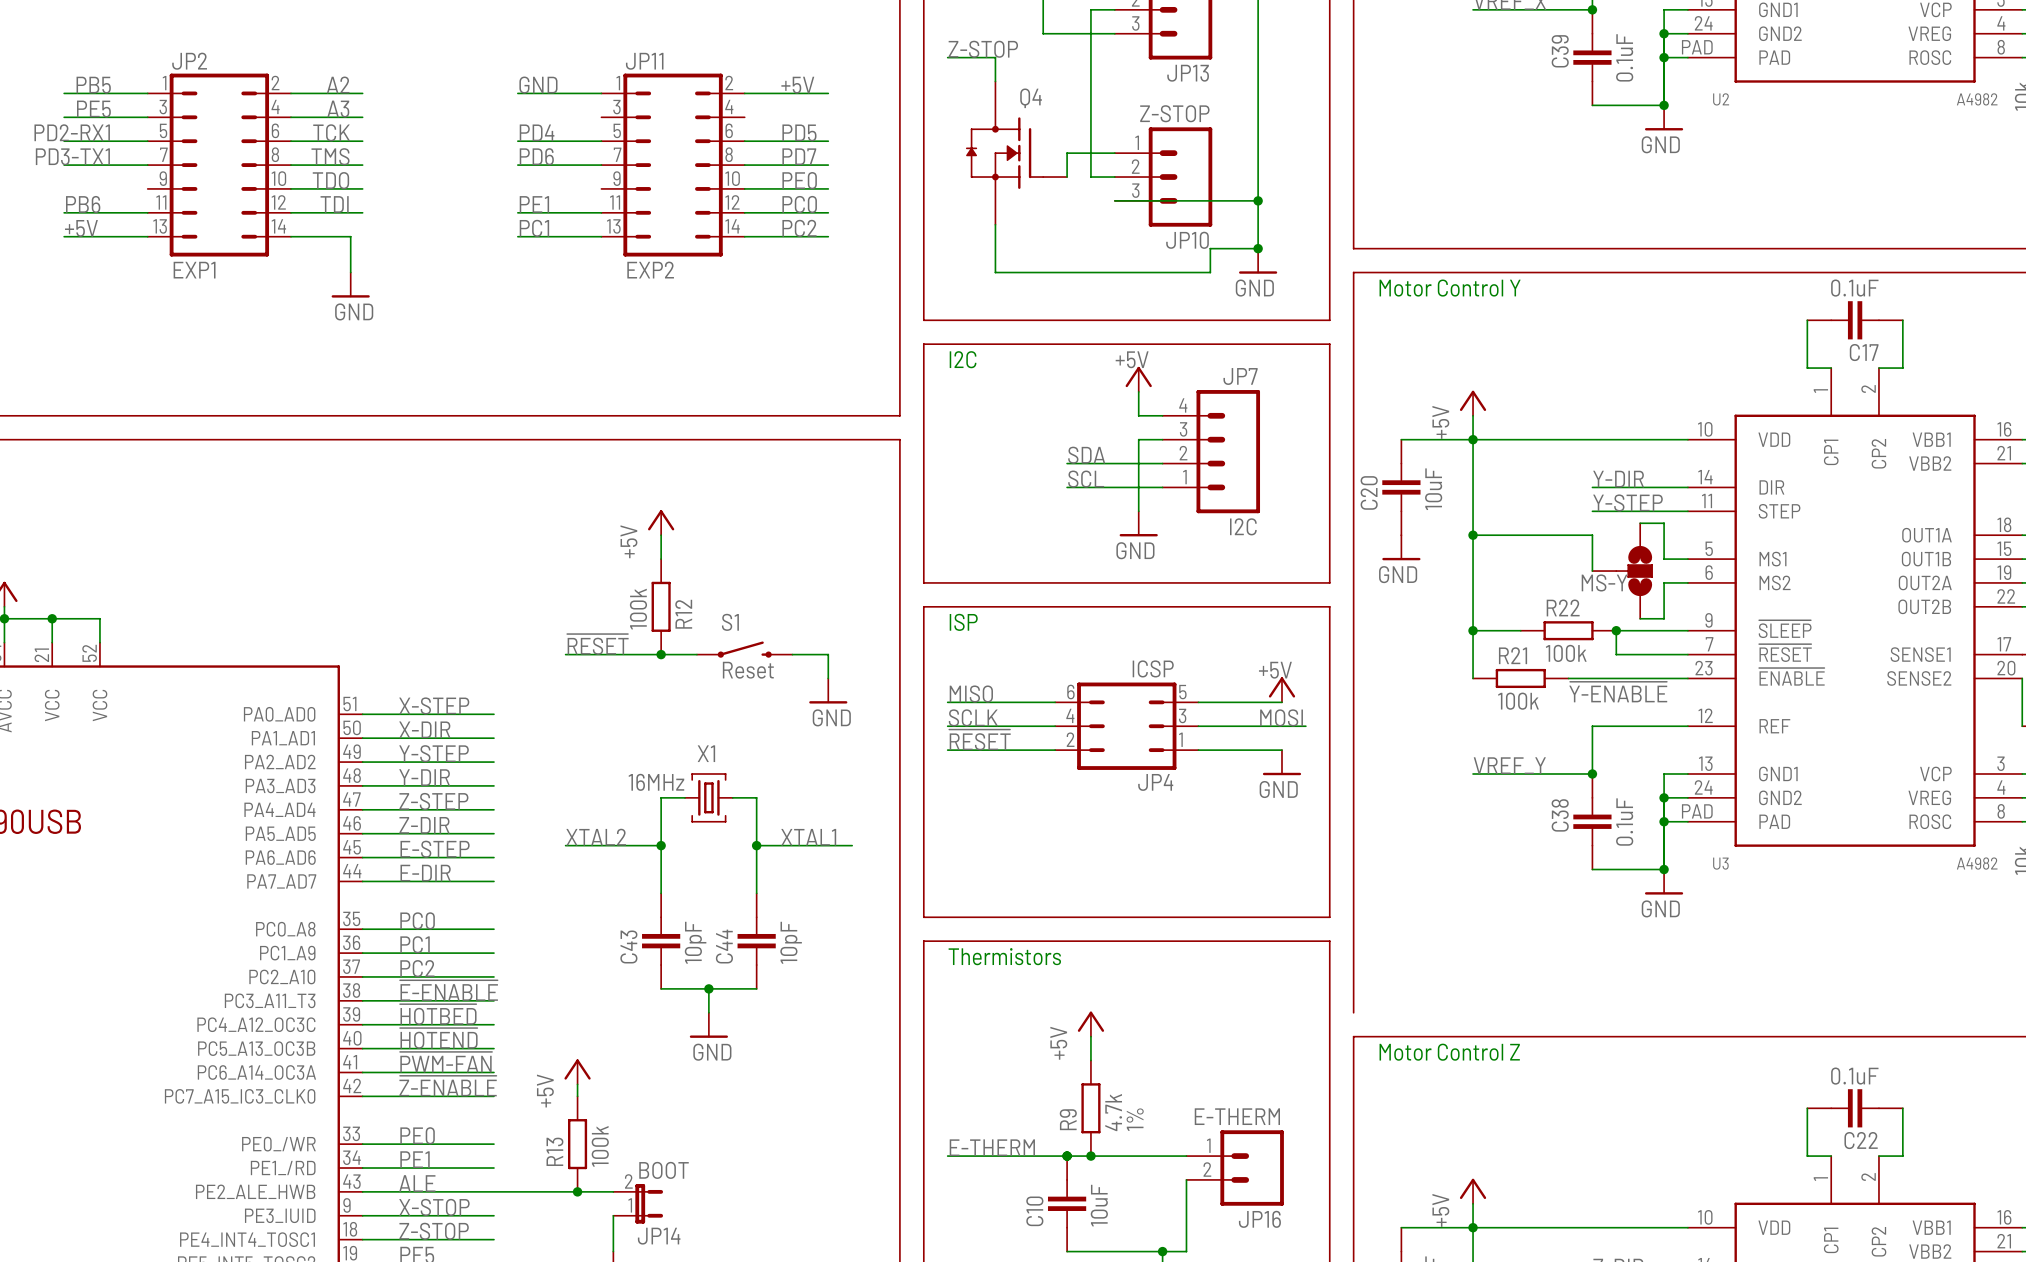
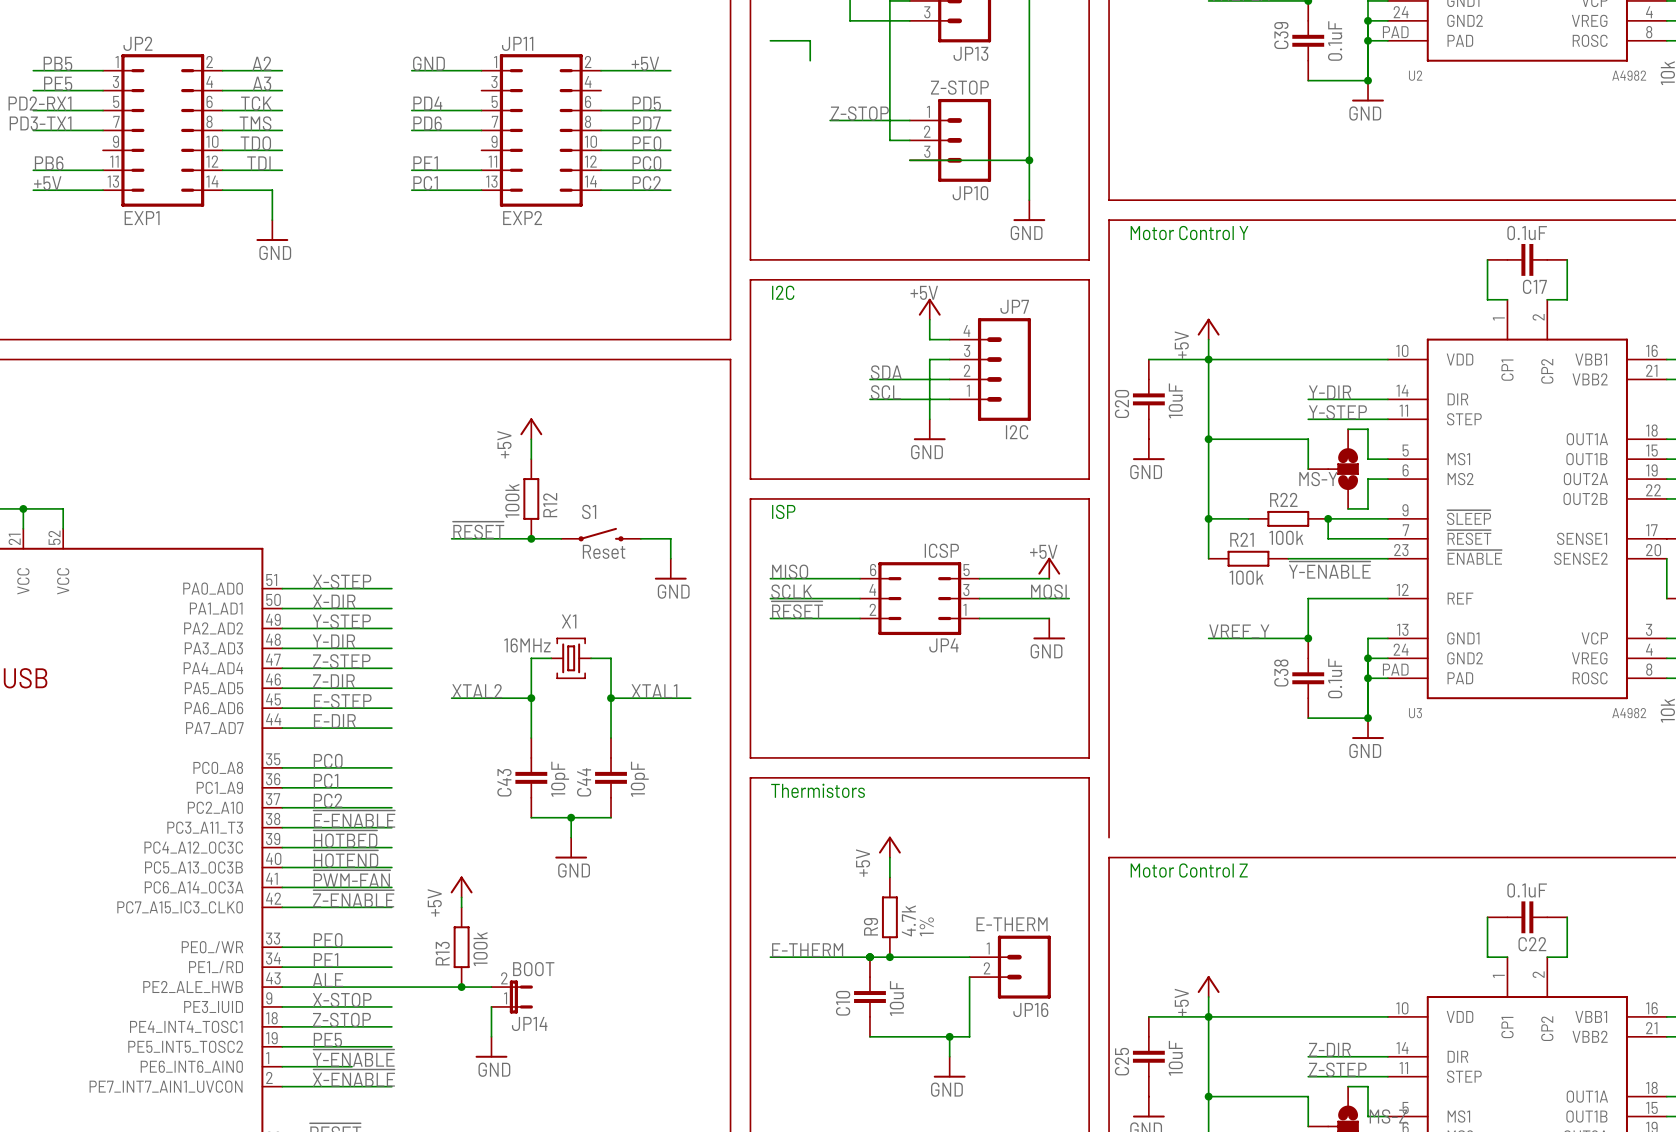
label position: Z-STOP (983, 49) -> Z-STOP (859, 113)
Q4: (1016, 153) -> none
wire: (1067, 153) (1067, 177) -> (869, 120) (830, 120)
wire: (995, 224) (995, 272) (1210, 272) (1210, 248) (1258, 248) -> none
junction: (1258, 248) -> none

